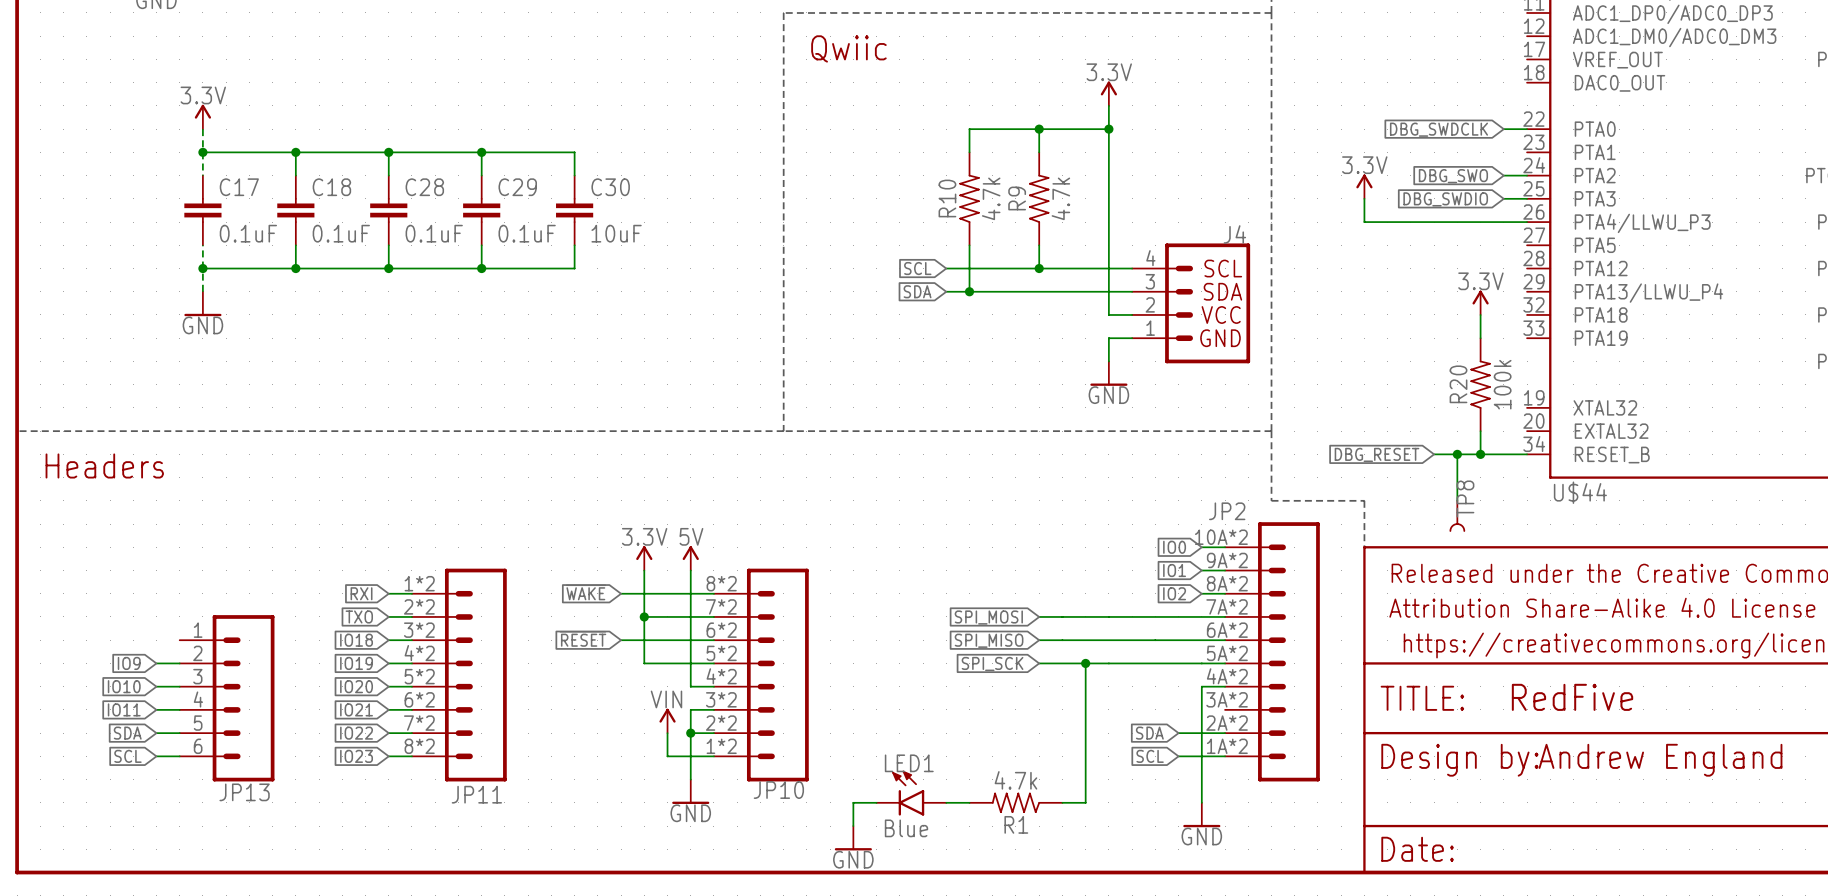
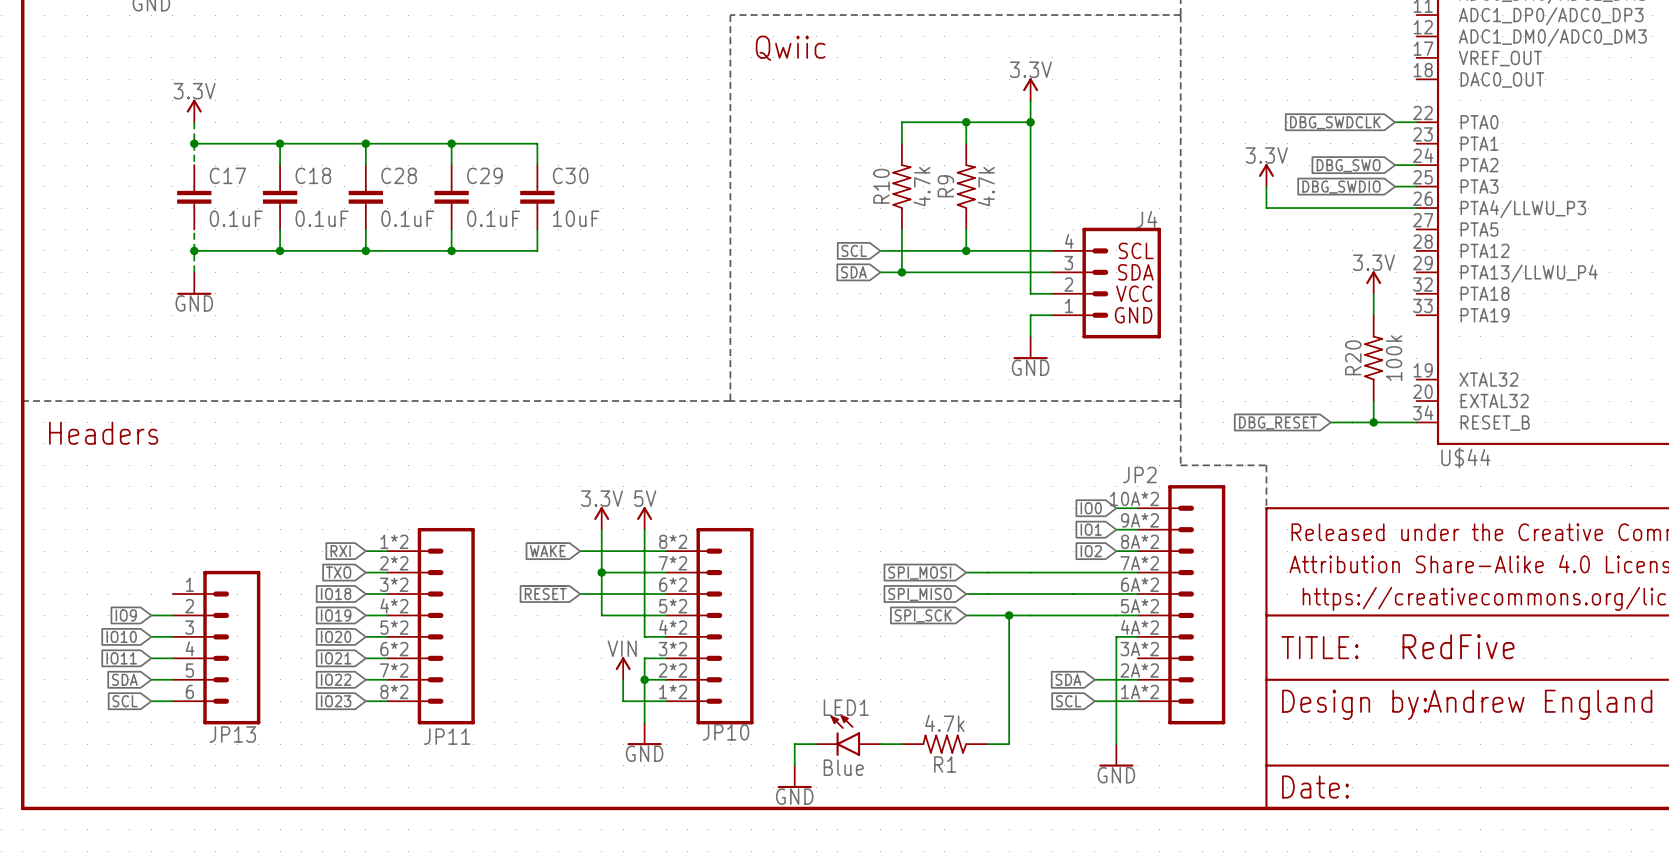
wire: (1457, 454) (1457, 500) -> none
junction: (1457, 454) -> none
TP8: (1457, 515) -> none

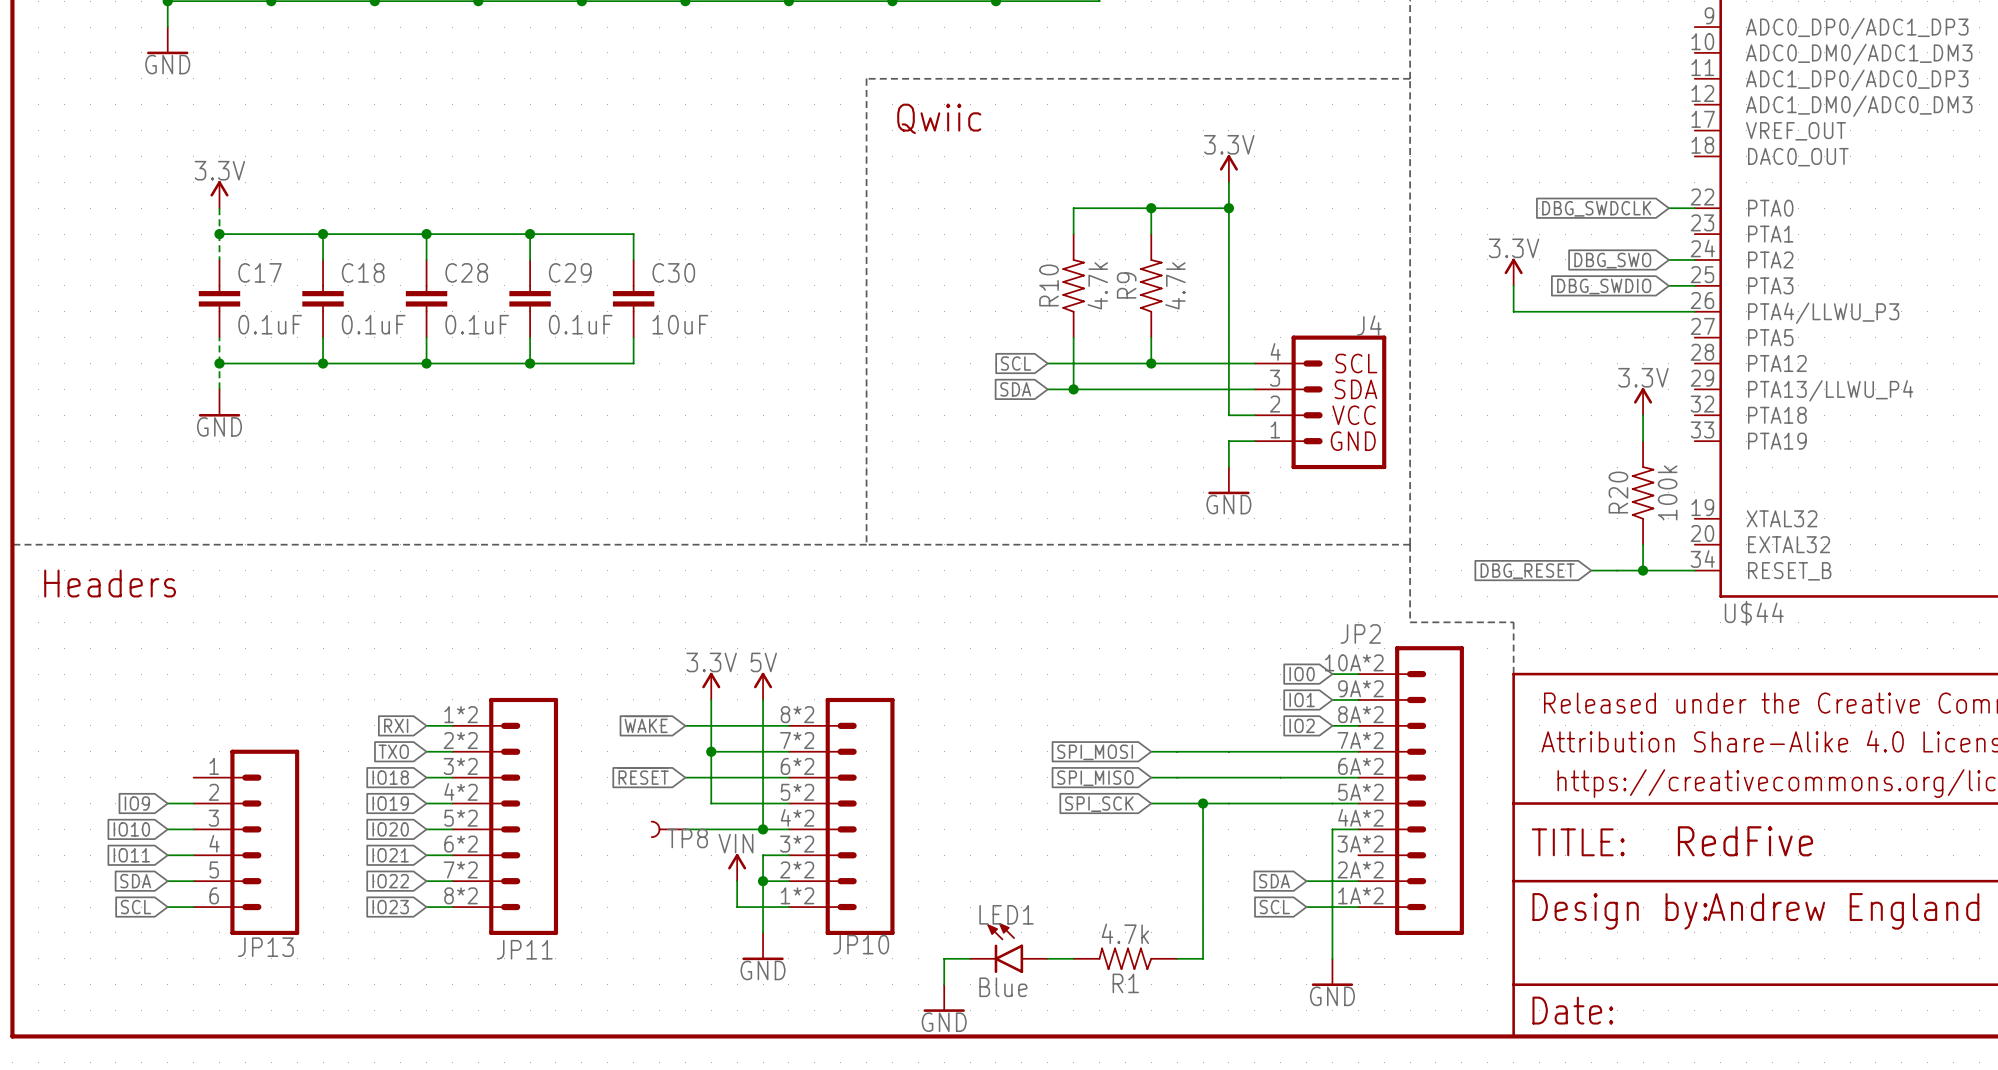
TP8: none -> (668, 829)
wire: none -> (685, 829) (763, 829)
junction: none -> (763, 829)

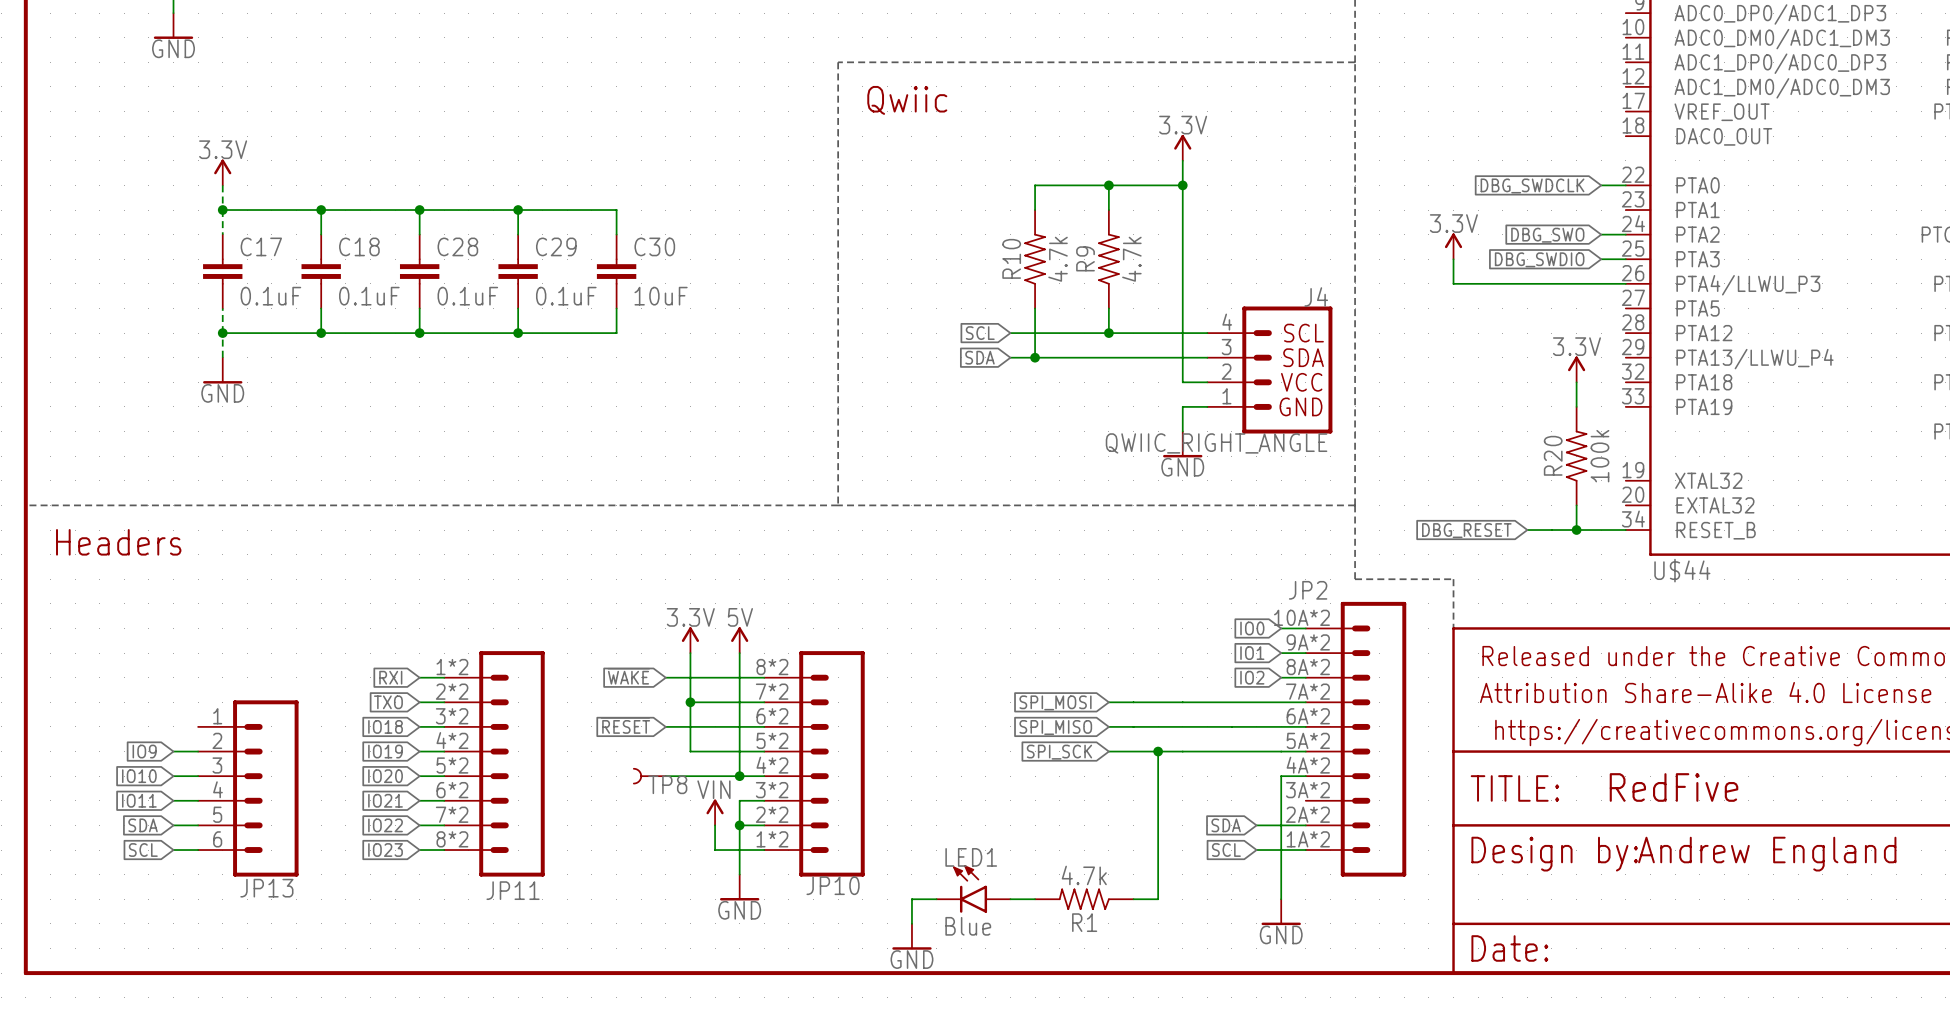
J4 value: none -> QWIIC_RIGHT_ANGLE (1216, 443)

